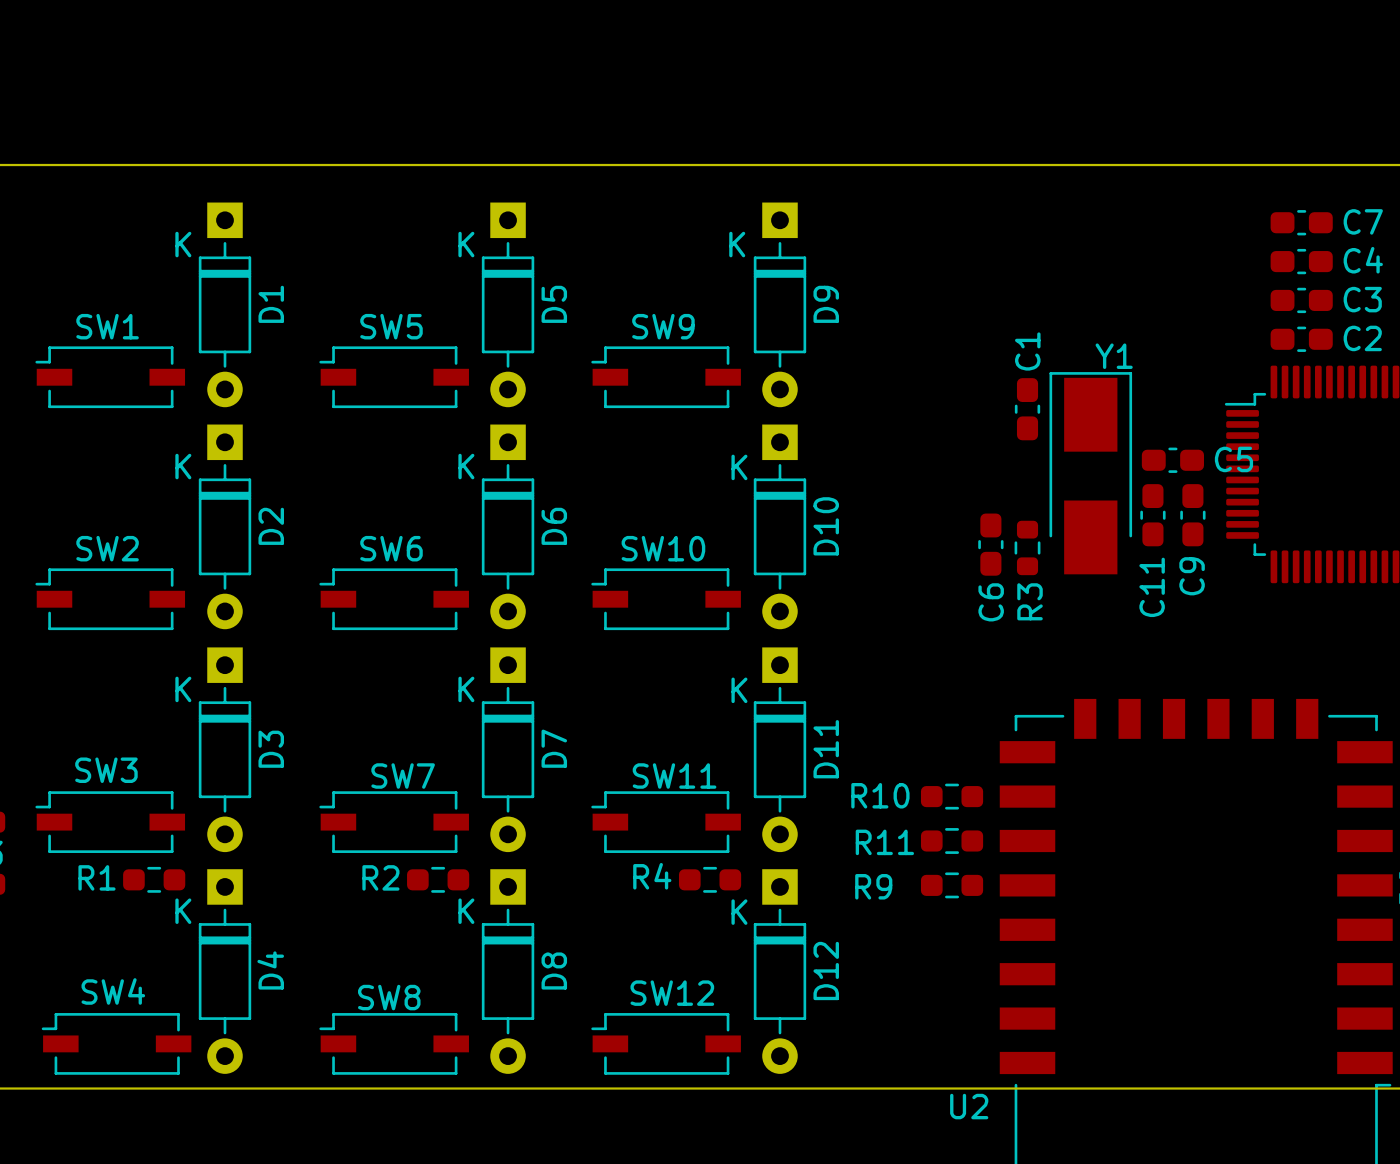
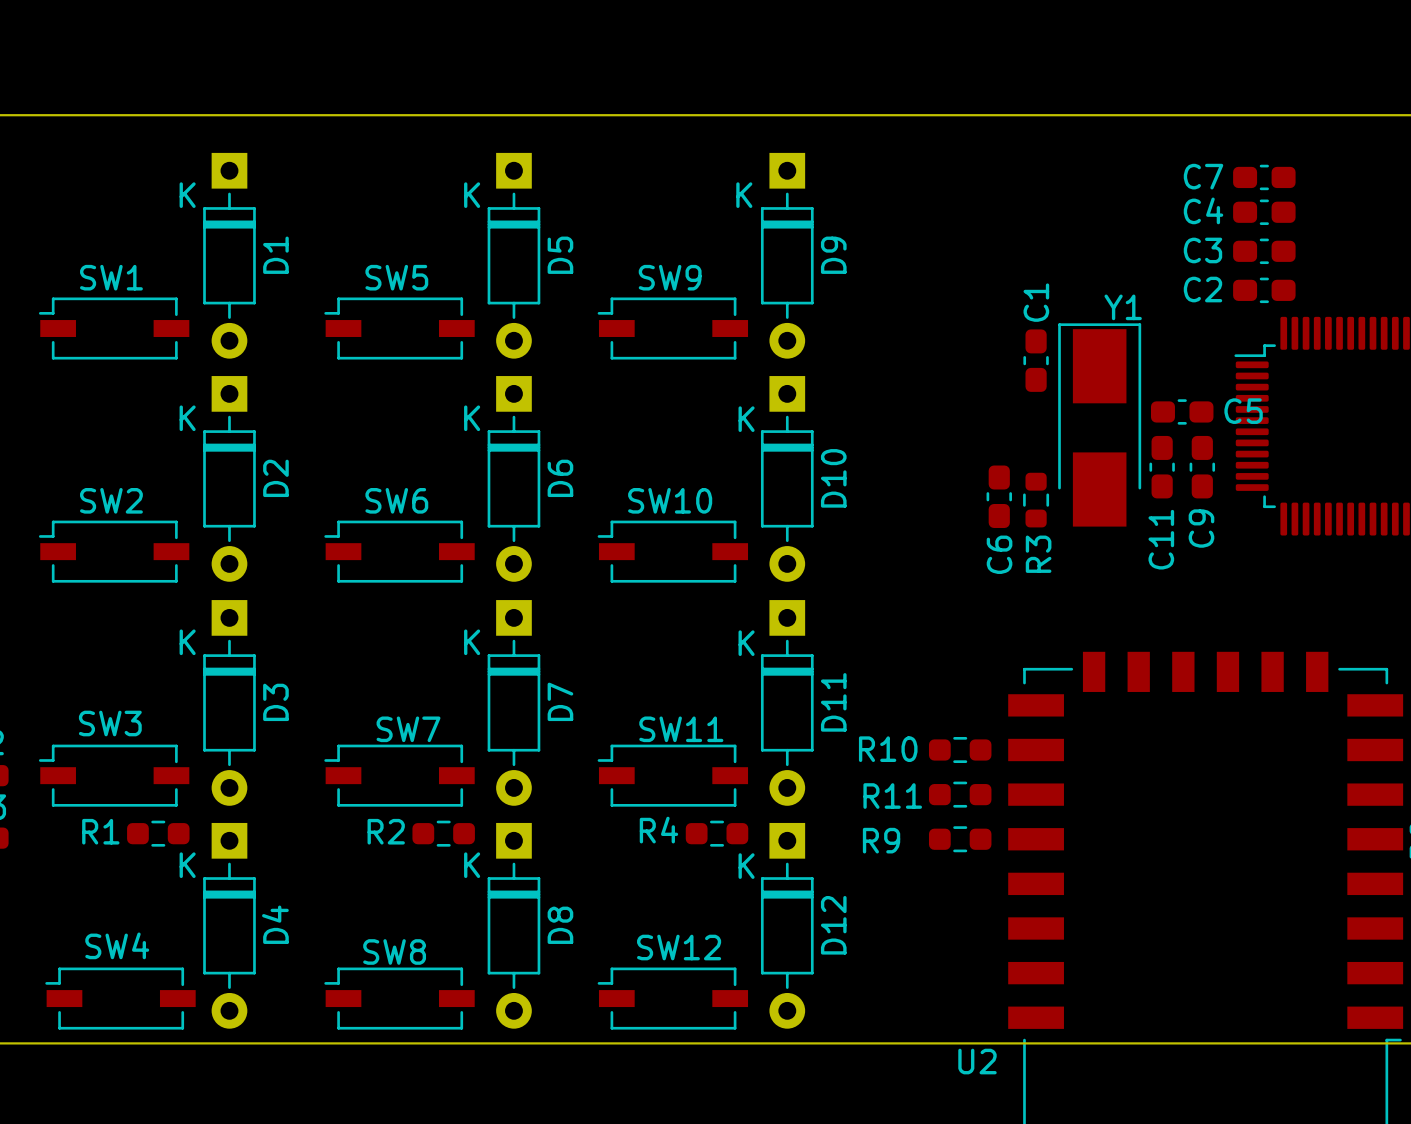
C7 name position: C7 (1363, 221) -> C7 (1203, 176)
C7 position: (1301, 222) -> (1264, 177)
C4 name position: C4 (1363, 260) -> C4 (1203, 210)
C4 position: (1301, 261) -> (1264, 212)
C3 name position: C3 (1362, 299) -> C3 (1202, 250)
C3 position: (1301, 300) -> (1264, 251)
C2 name position: C2 (1362, 338) -> C2 (1202, 289)
C2 position: (1301, 339) -> (1264, 290)

